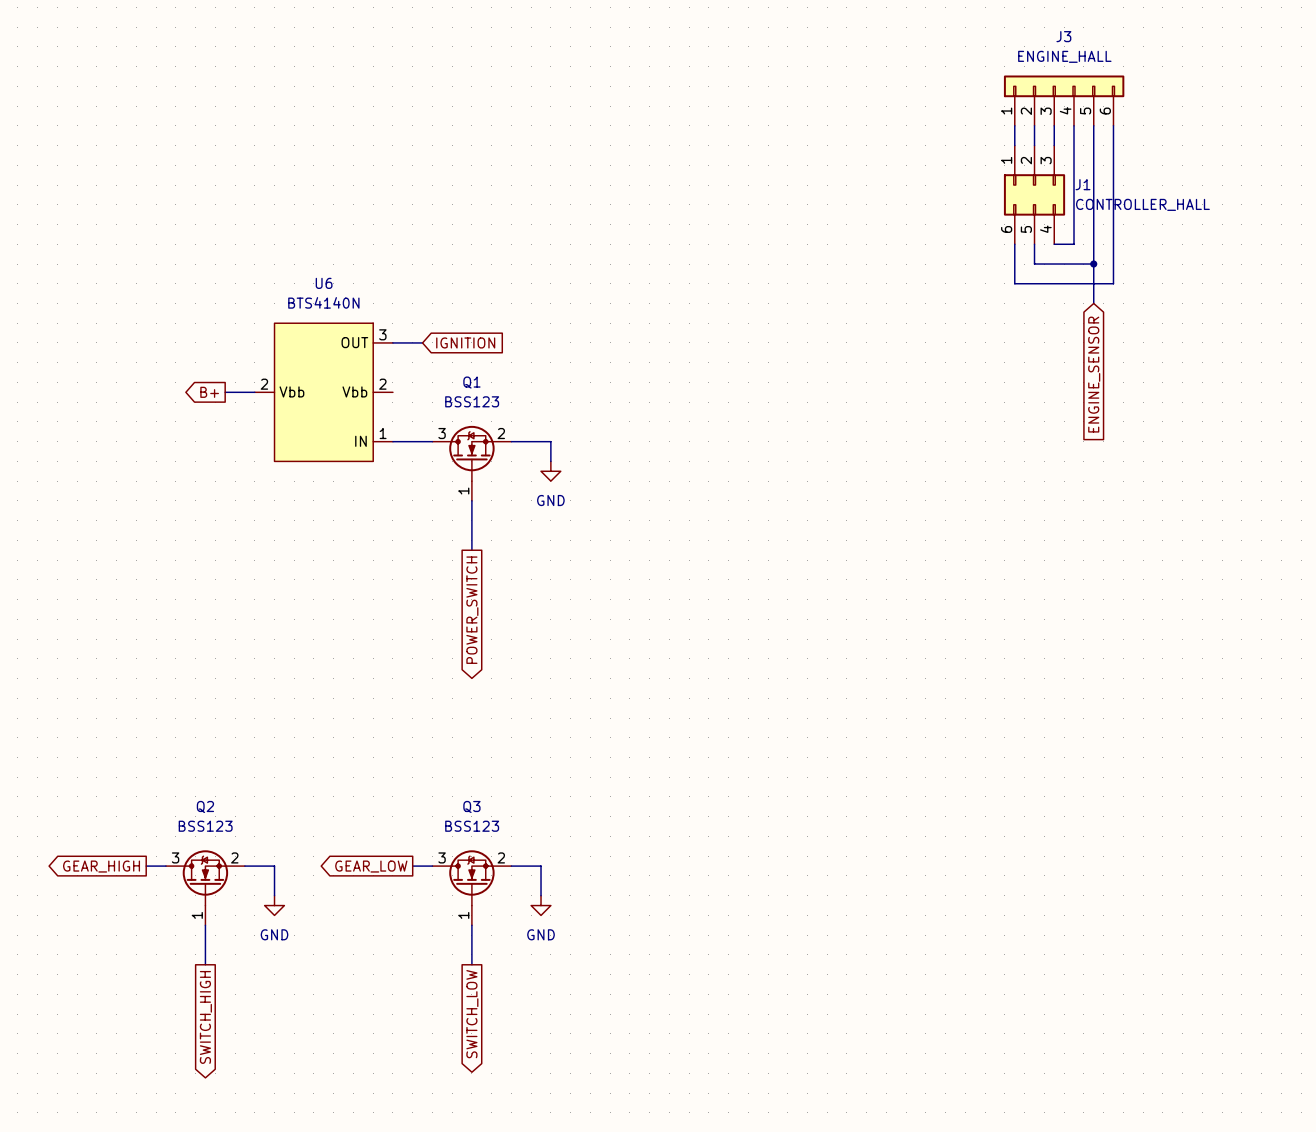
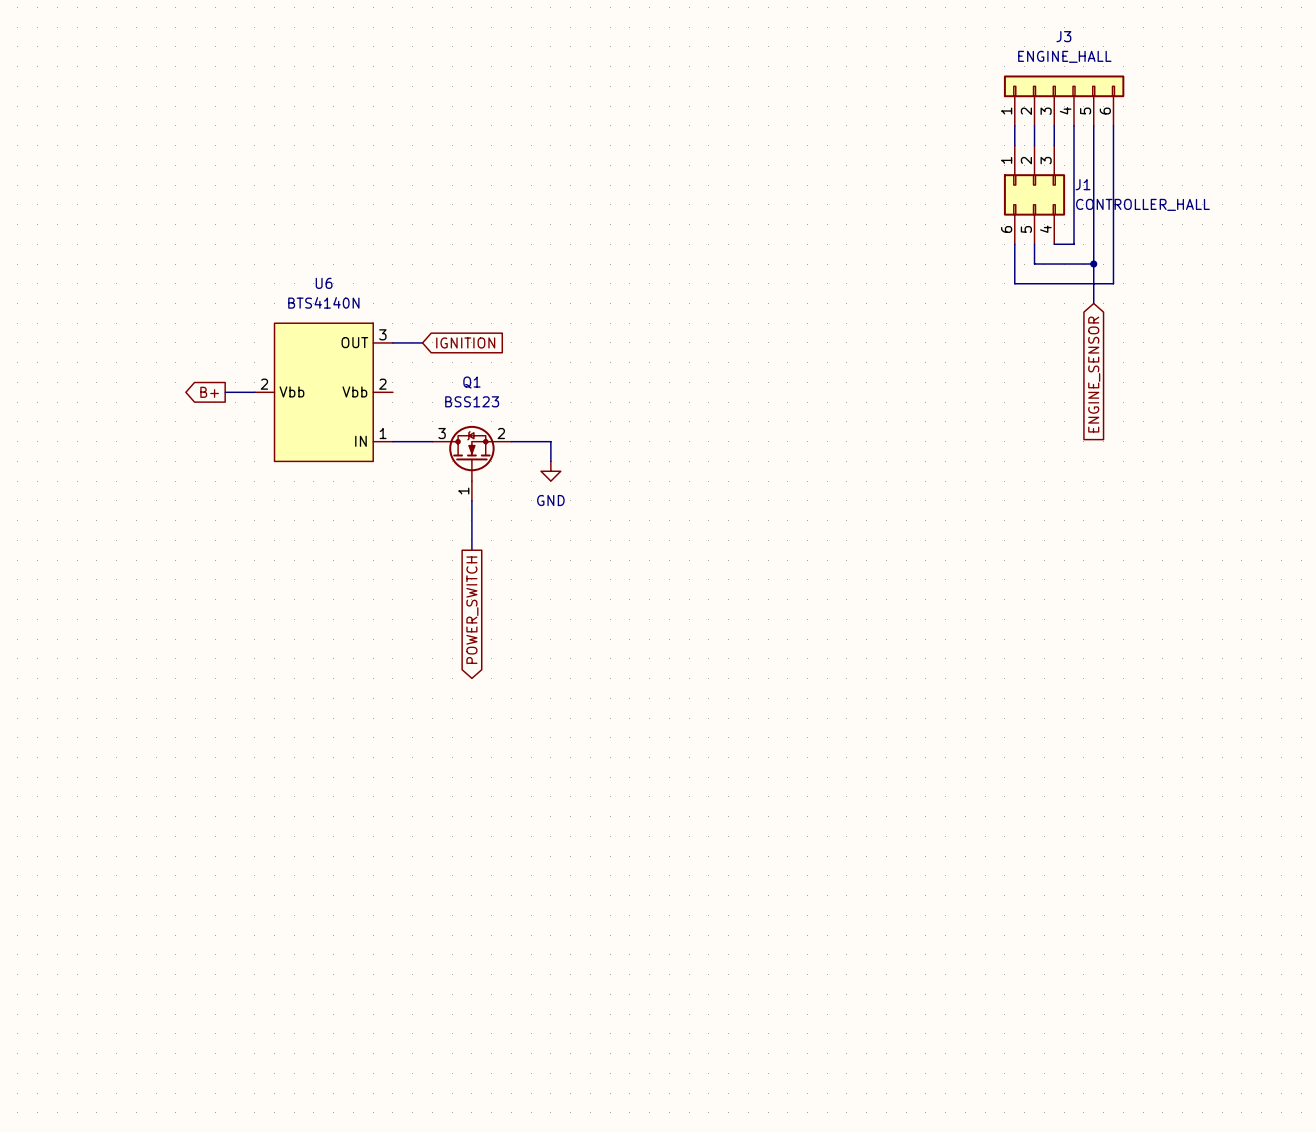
global label: GEAR_HIGH (101, 866) -> none
wire: (146, 866) (165, 866) -> none
wire: (244, 866) (274, 866) (274, 895) -> none
global label: GEAR_LOW (371, 866) -> none
wire: (412, 866) (432, 866) -> none
wire: (511, 866) (541, 866) (541, 895) -> none
Q2: BSS123 (205, 887) -> none
Q3: BSS123 (471, 887) -> none
power symbol: GND (274, 905) -> none
power symbol: GND (541, 905) -> none
wire: (205, 925) (205, 964) -> none
wire: (471, 925) (471, 964) -> none
global label: SWITCH_LOW (472, 1014) -> none
global label: SWITCH_HIGH (205, 1017) -> none

